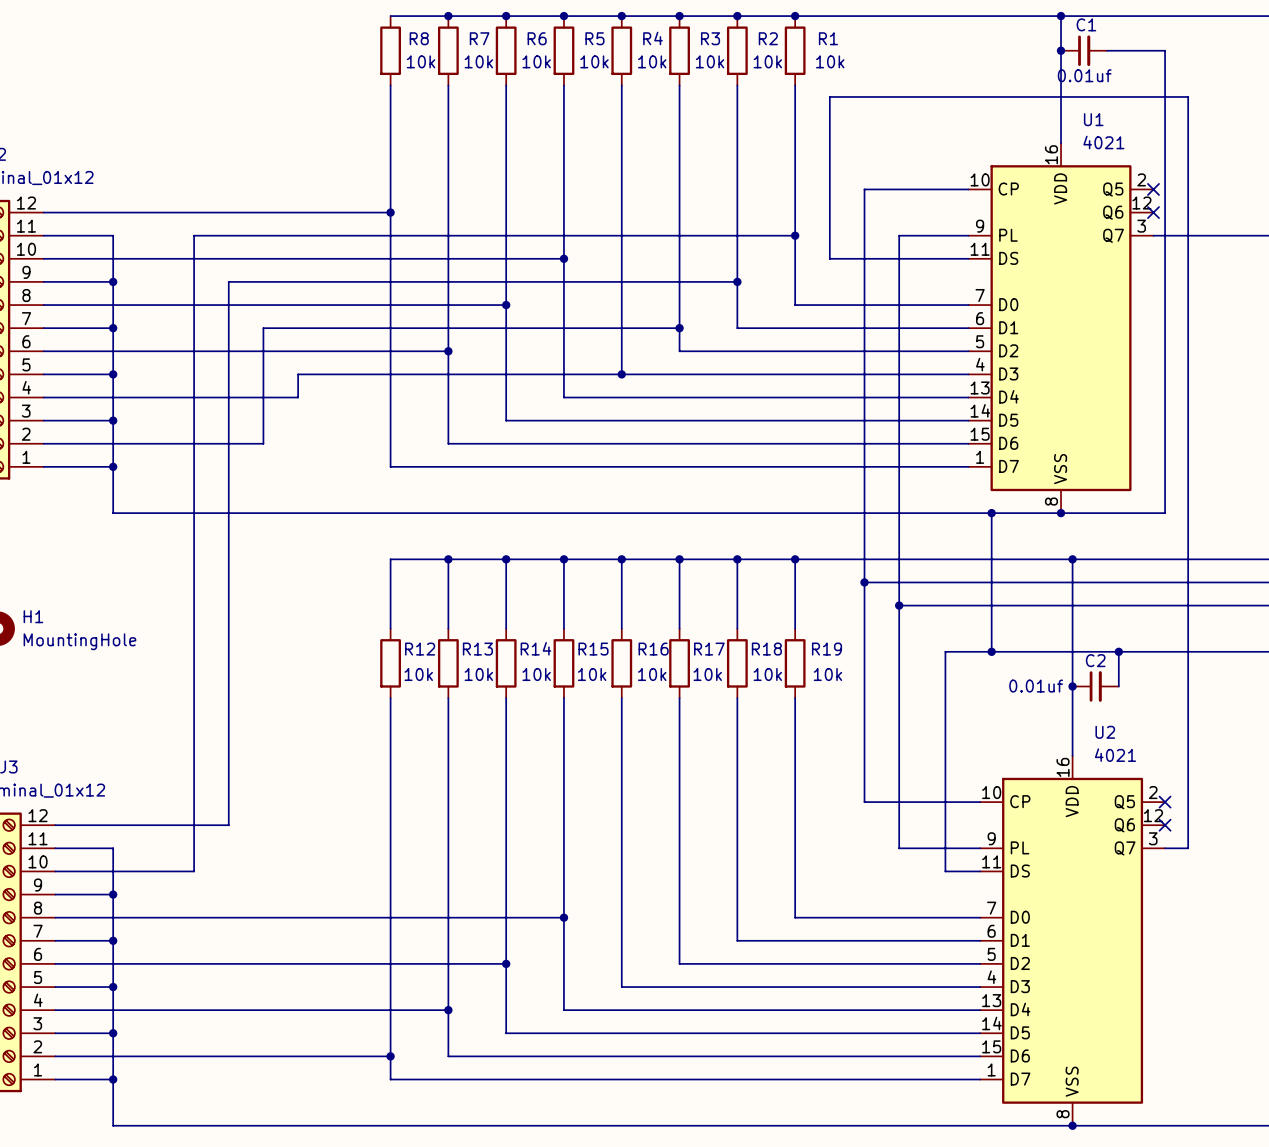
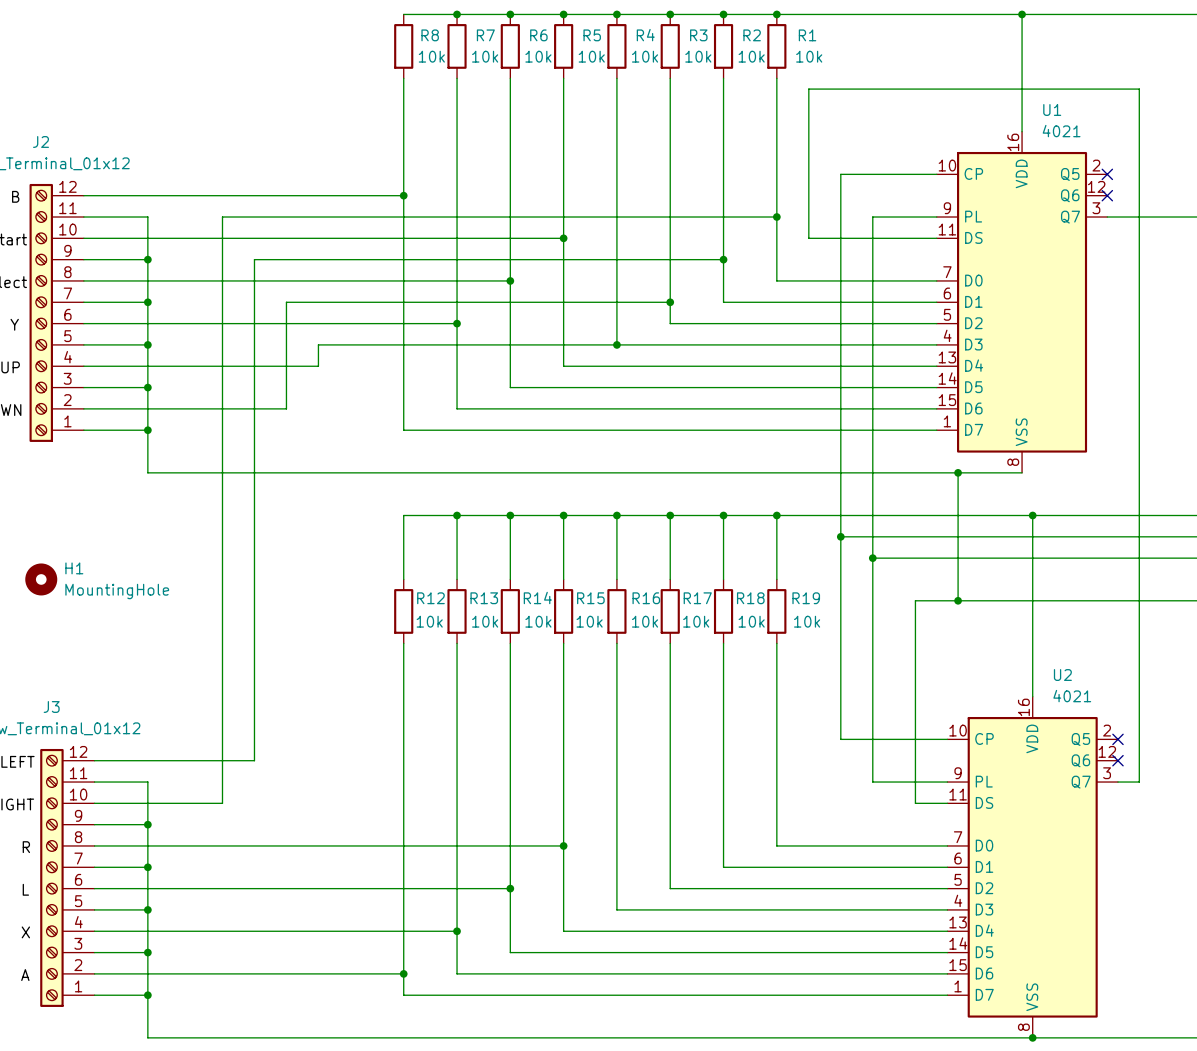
junction: (1061, 50) -> none
C1: 0.01uf (1084, 50) -> none
wire: (1107, 50) (1165, 50) (1165, 513) (1061, 513) -> none
junction: (1061, 513) -> none
wire: (1118, 651) (1118, 686) -> none
junction: (1118, 651) -> none
junction: (1072, 686) -> none
C2: 0.01uf (1095, 686) -> none

